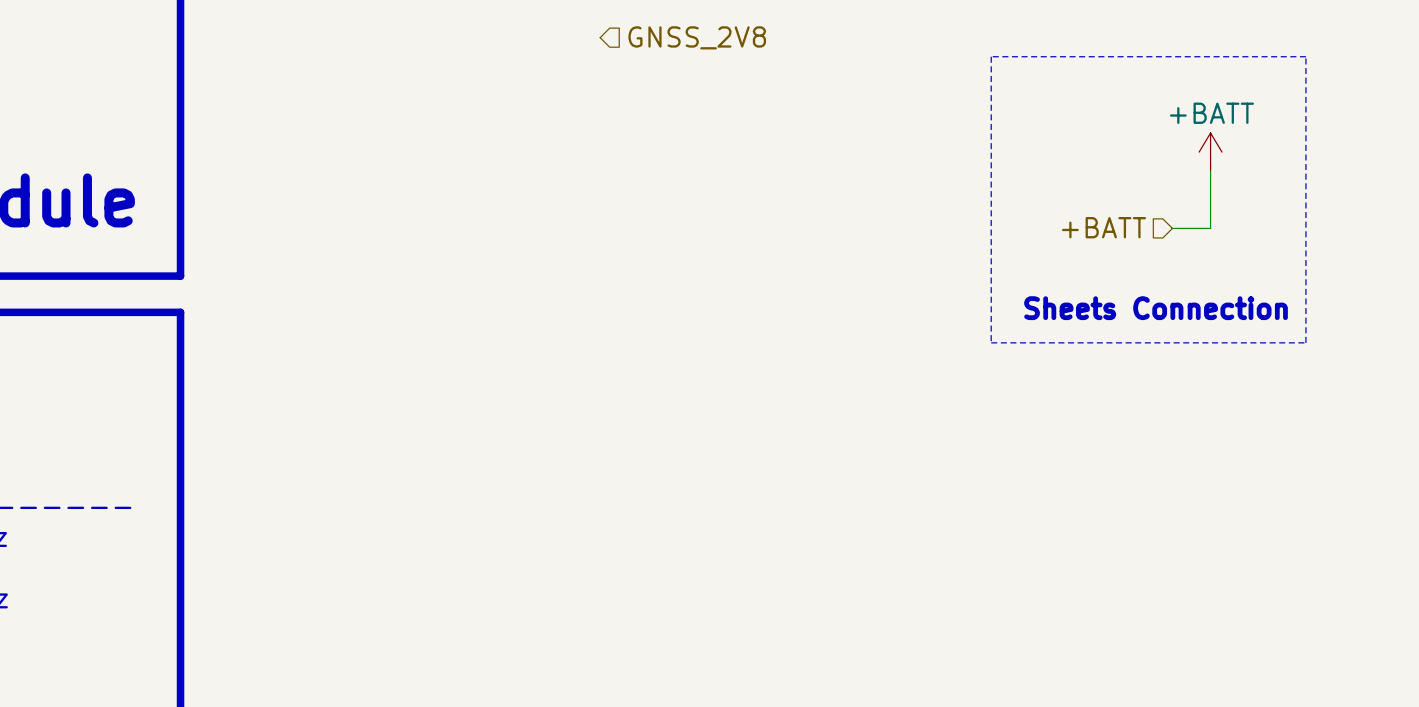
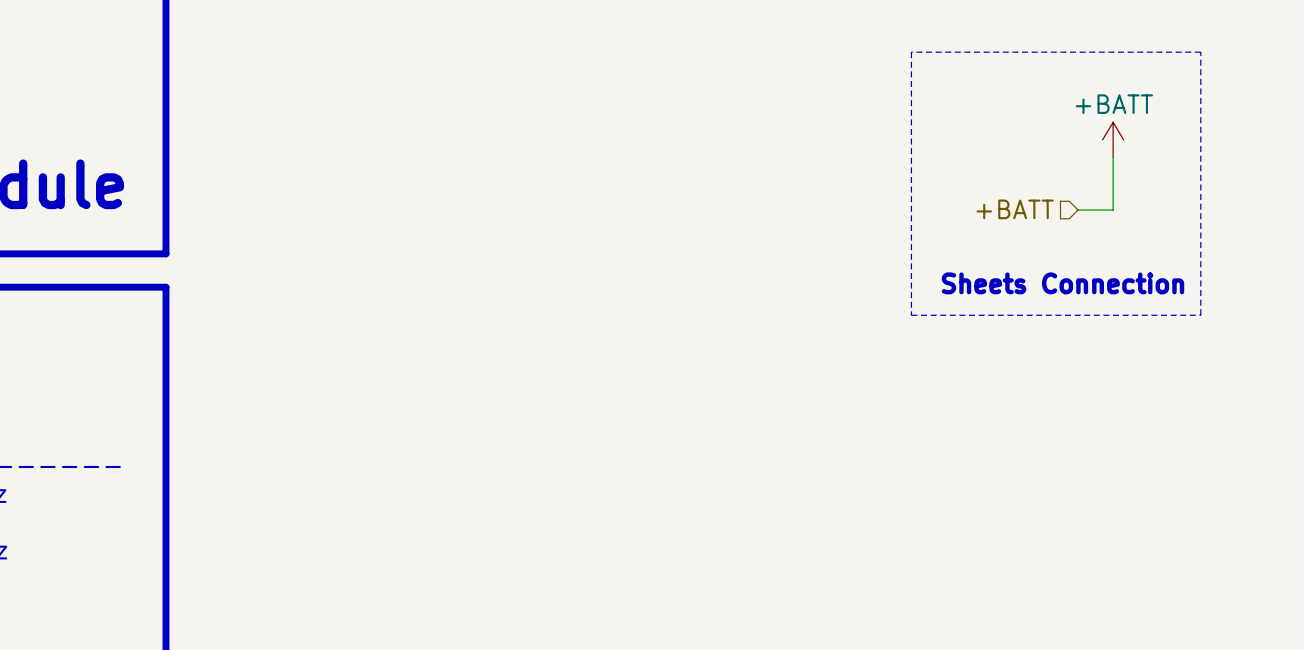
hierarchical label: GNSS_2V8 (697, 37) -> none

